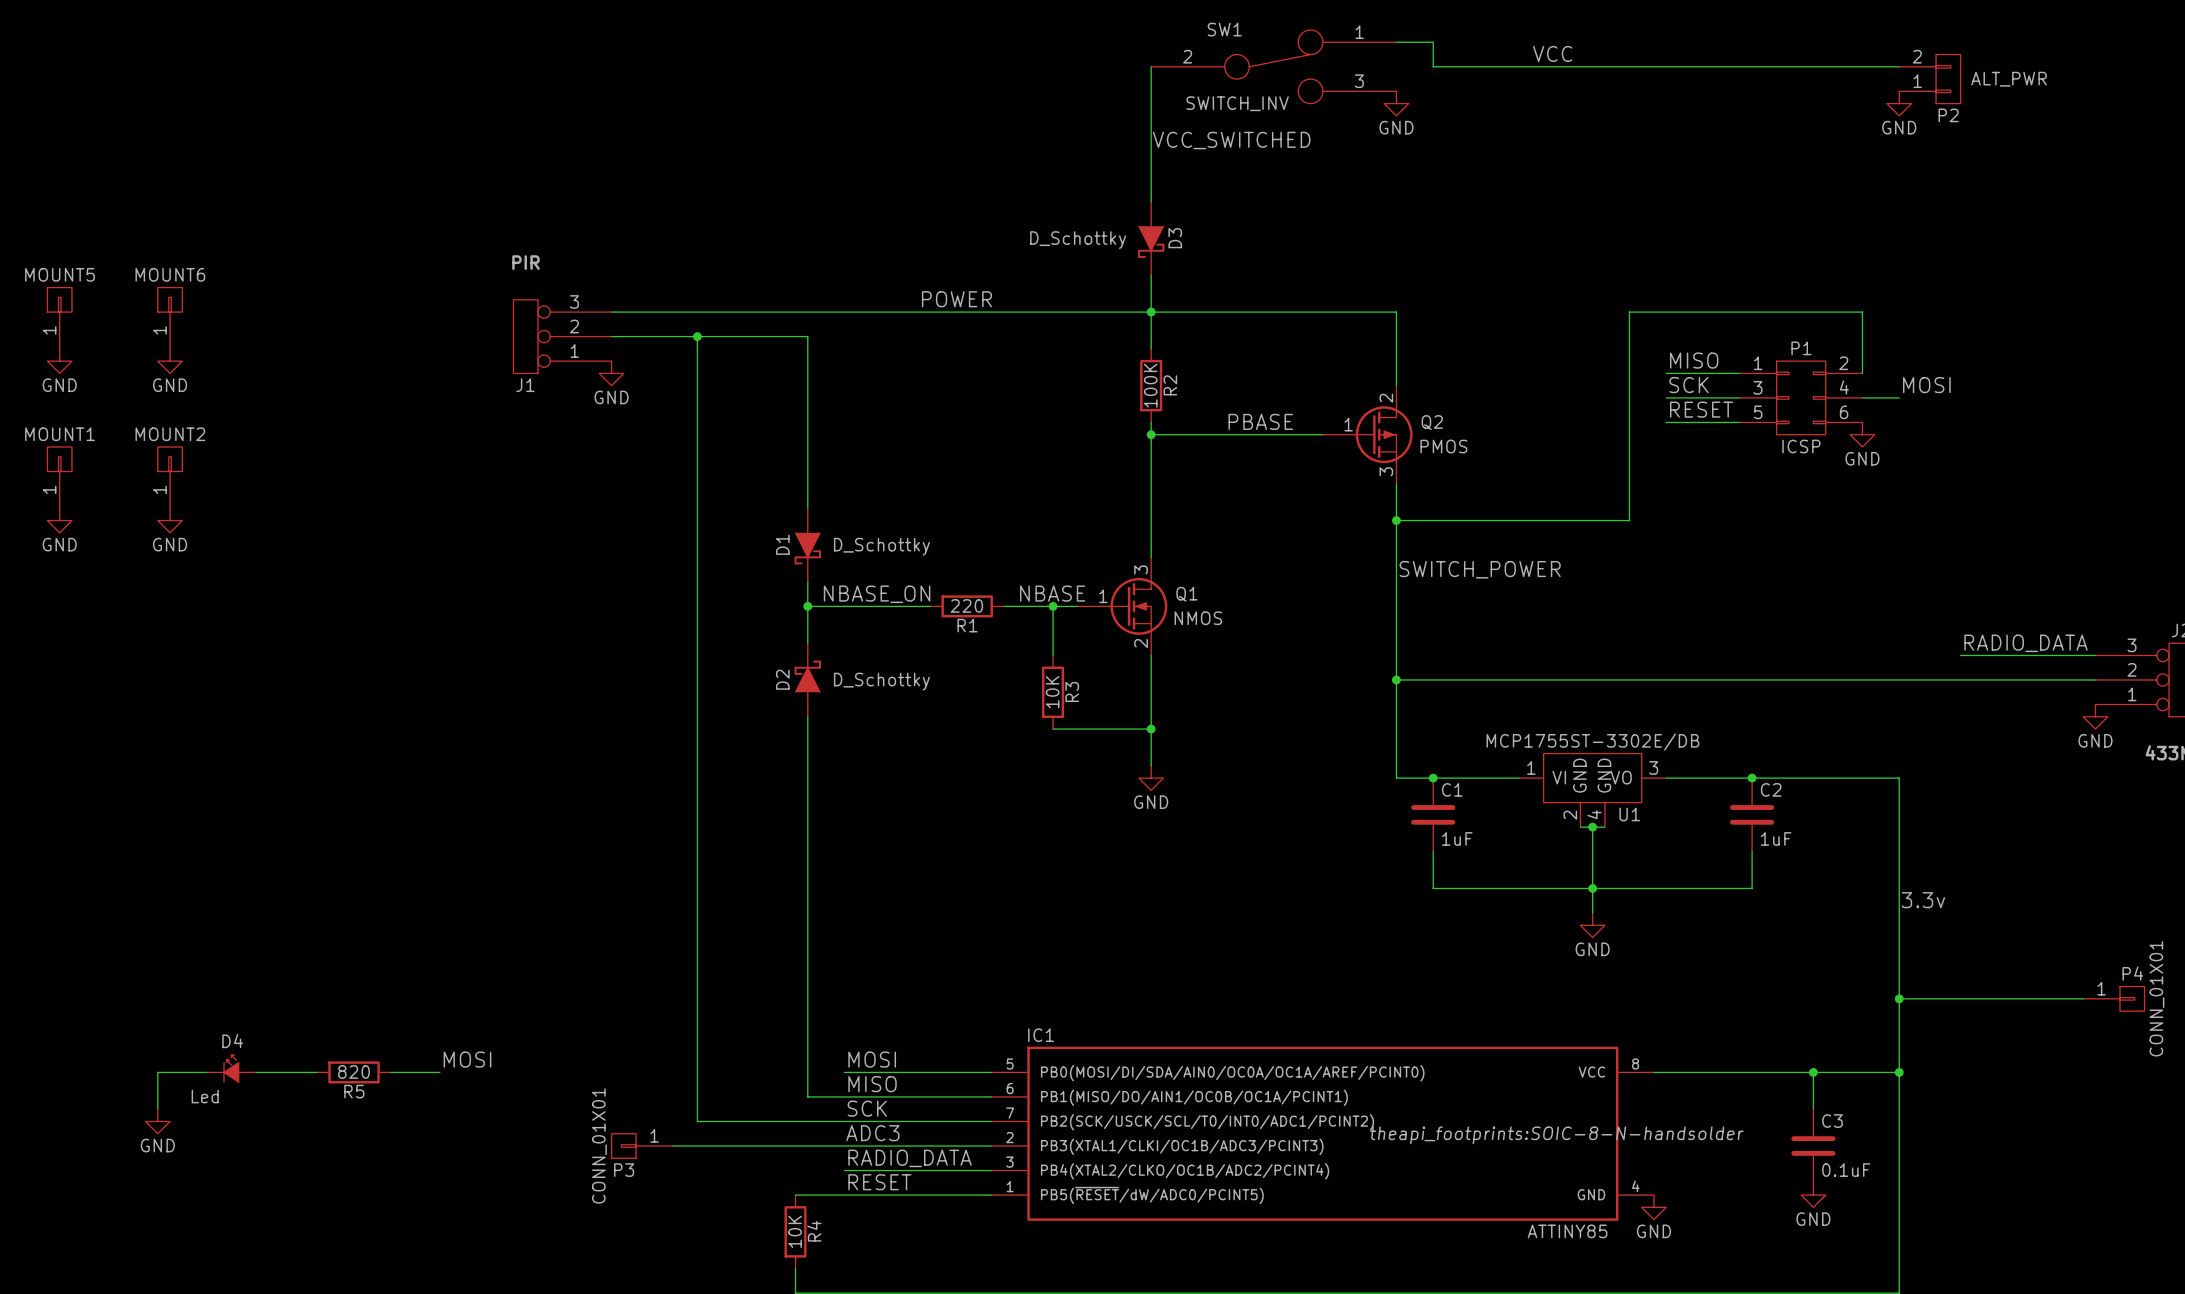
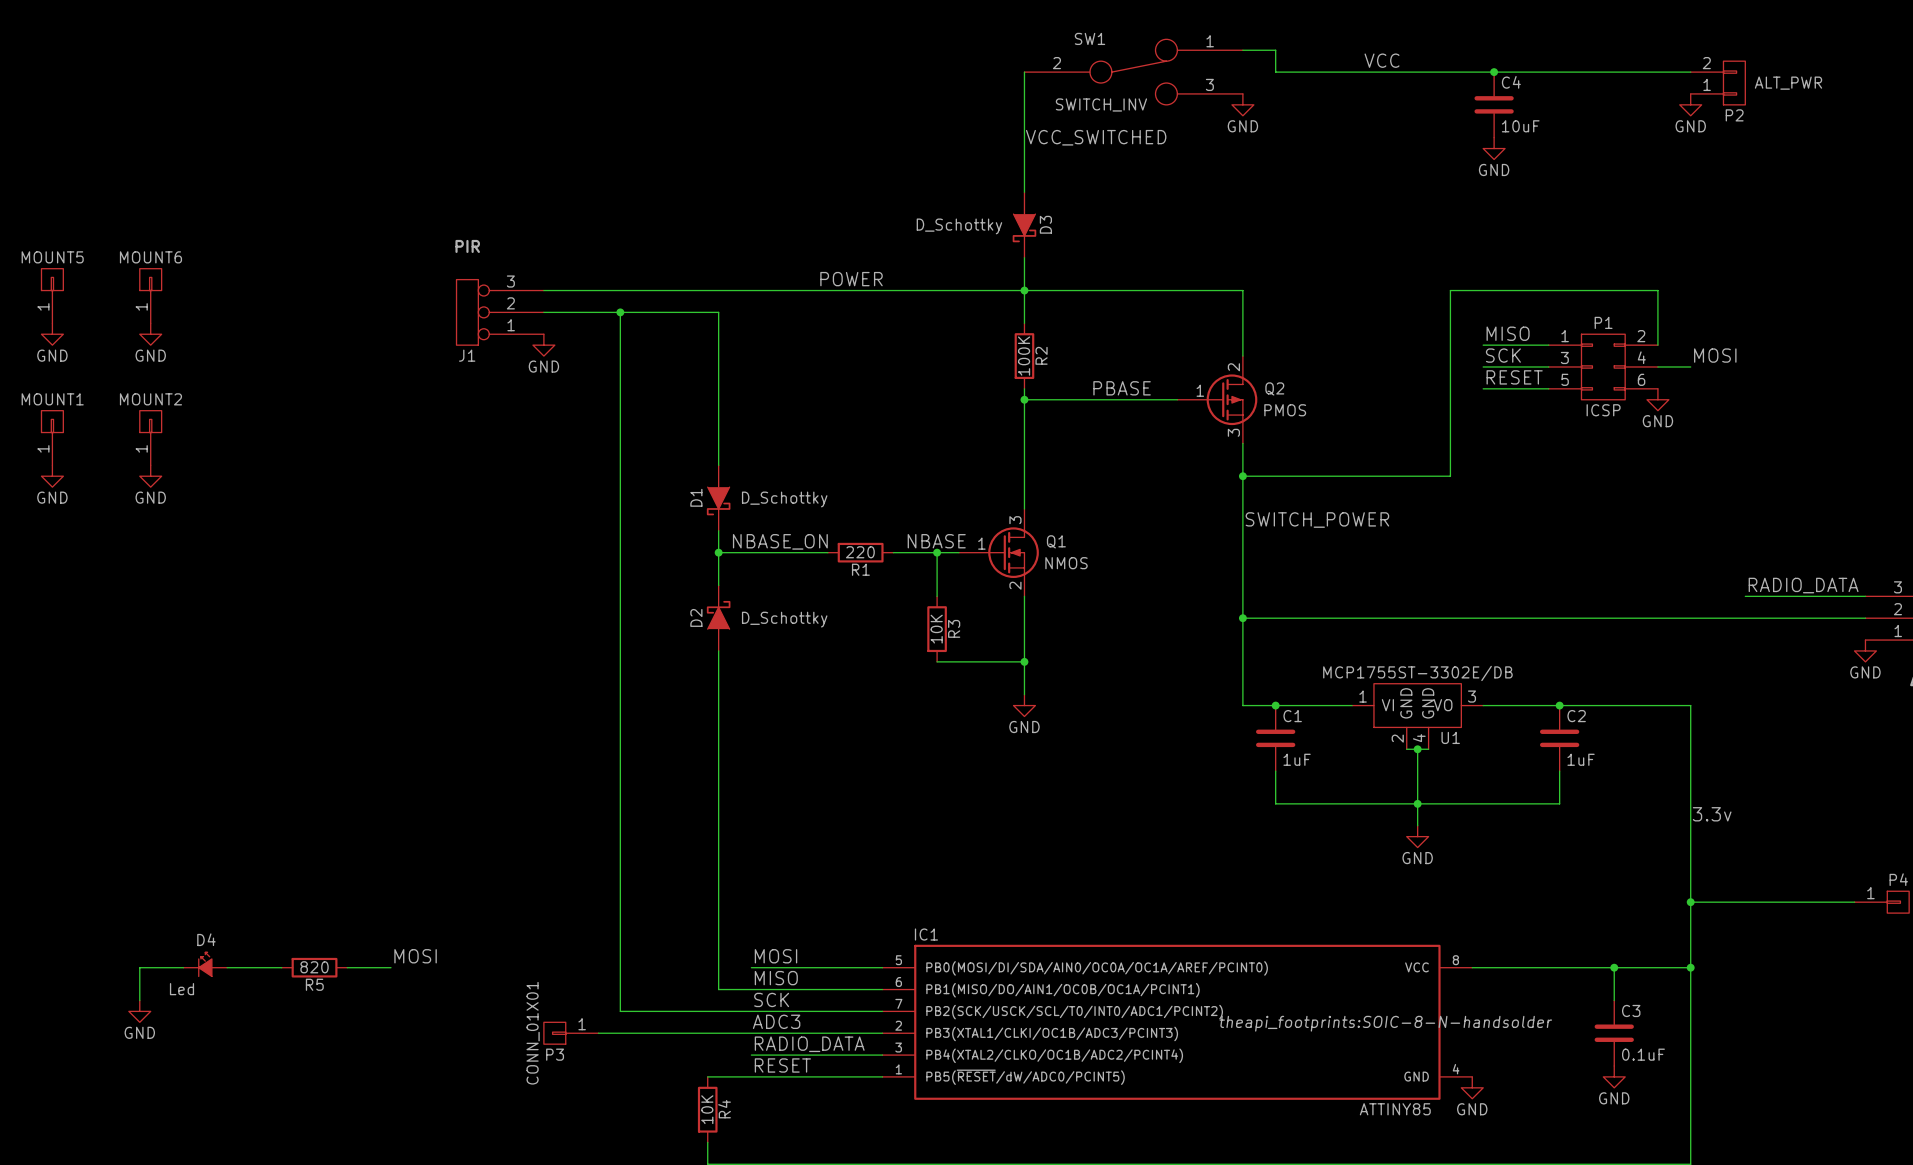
junction: none -> (1494, 72)
C4: none -> 10uF (1494, 104)
power symbol: none -> GND (1494, 148)

